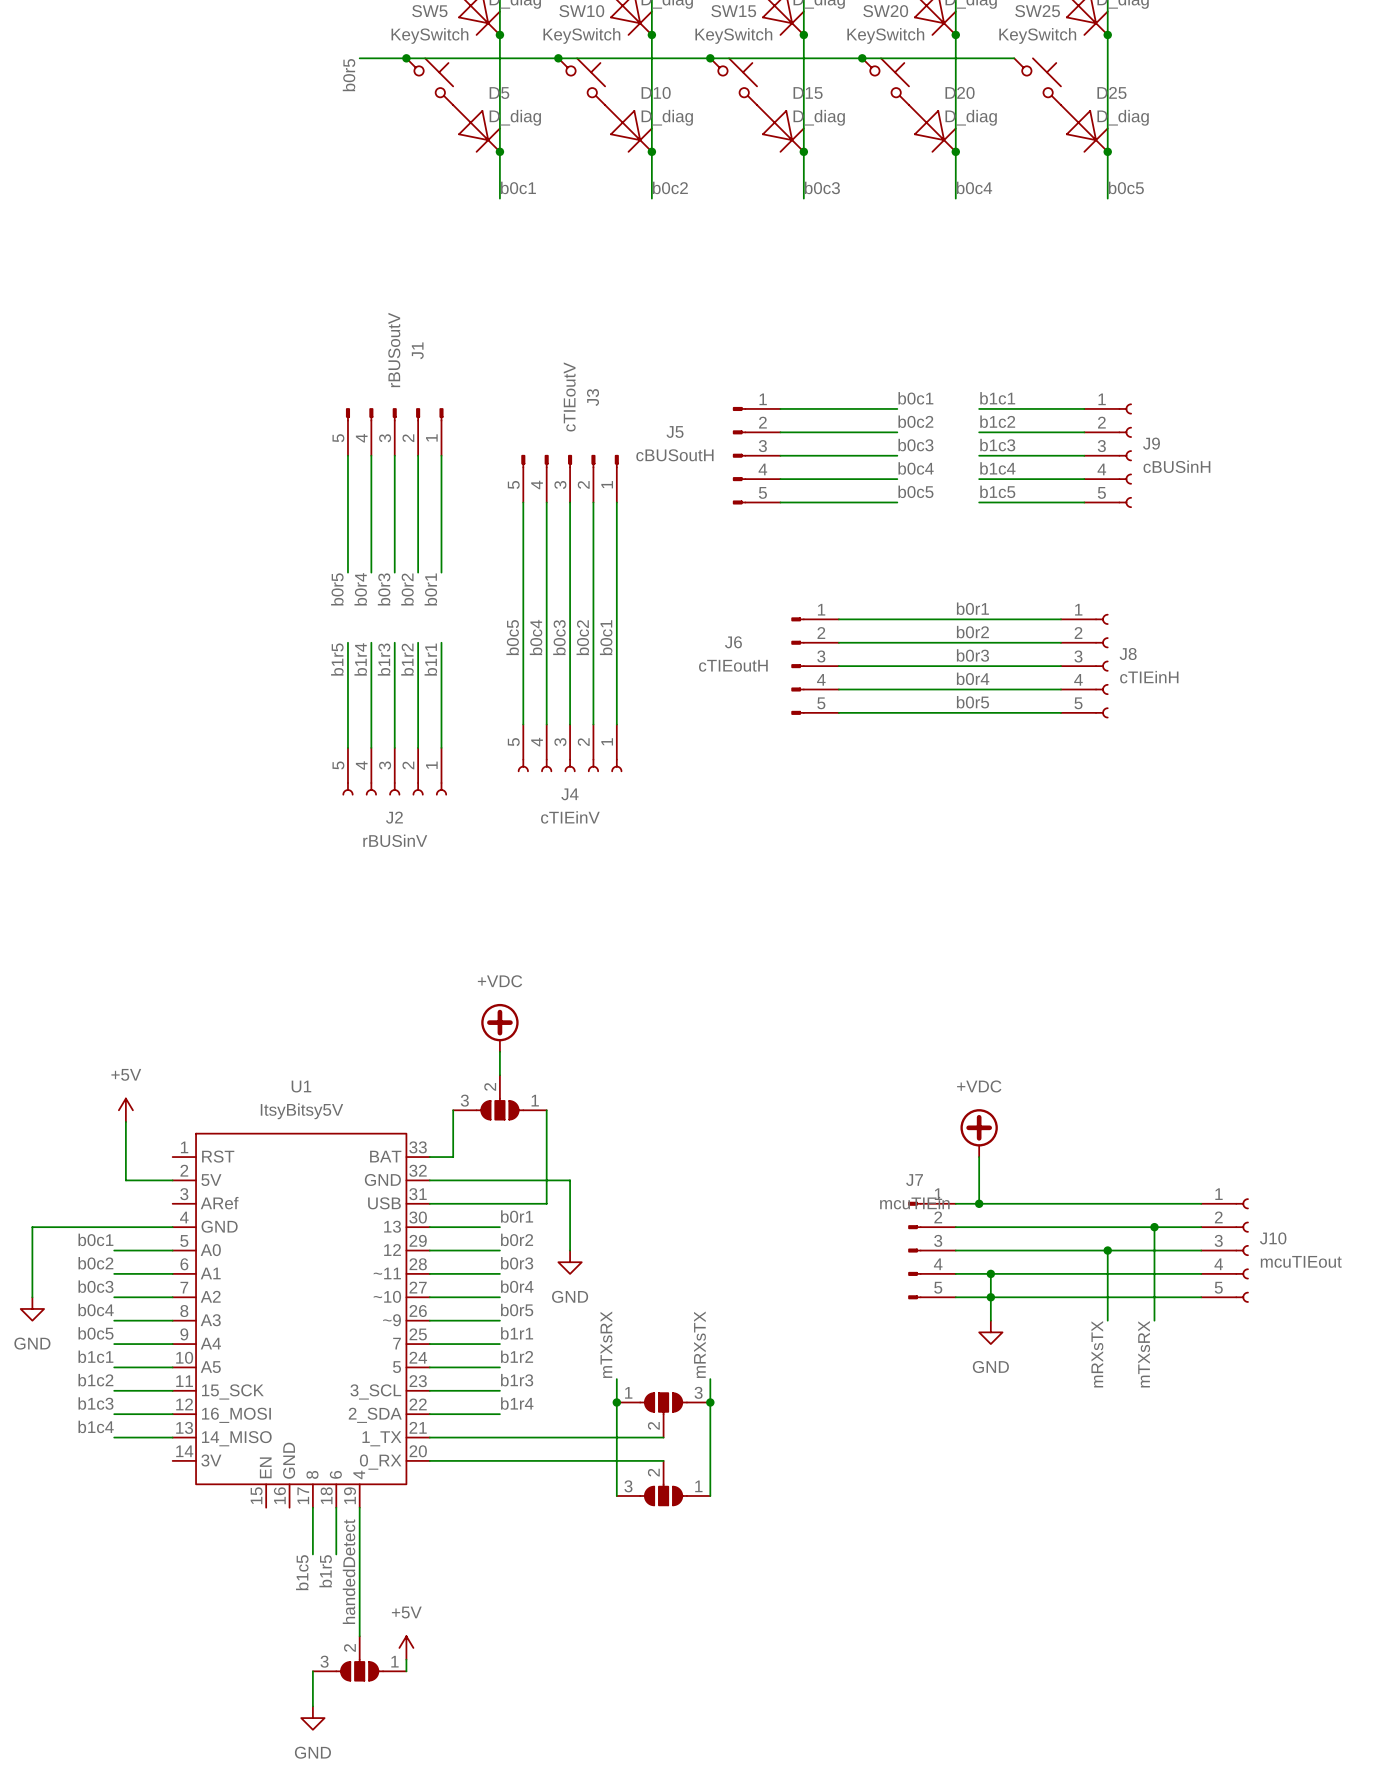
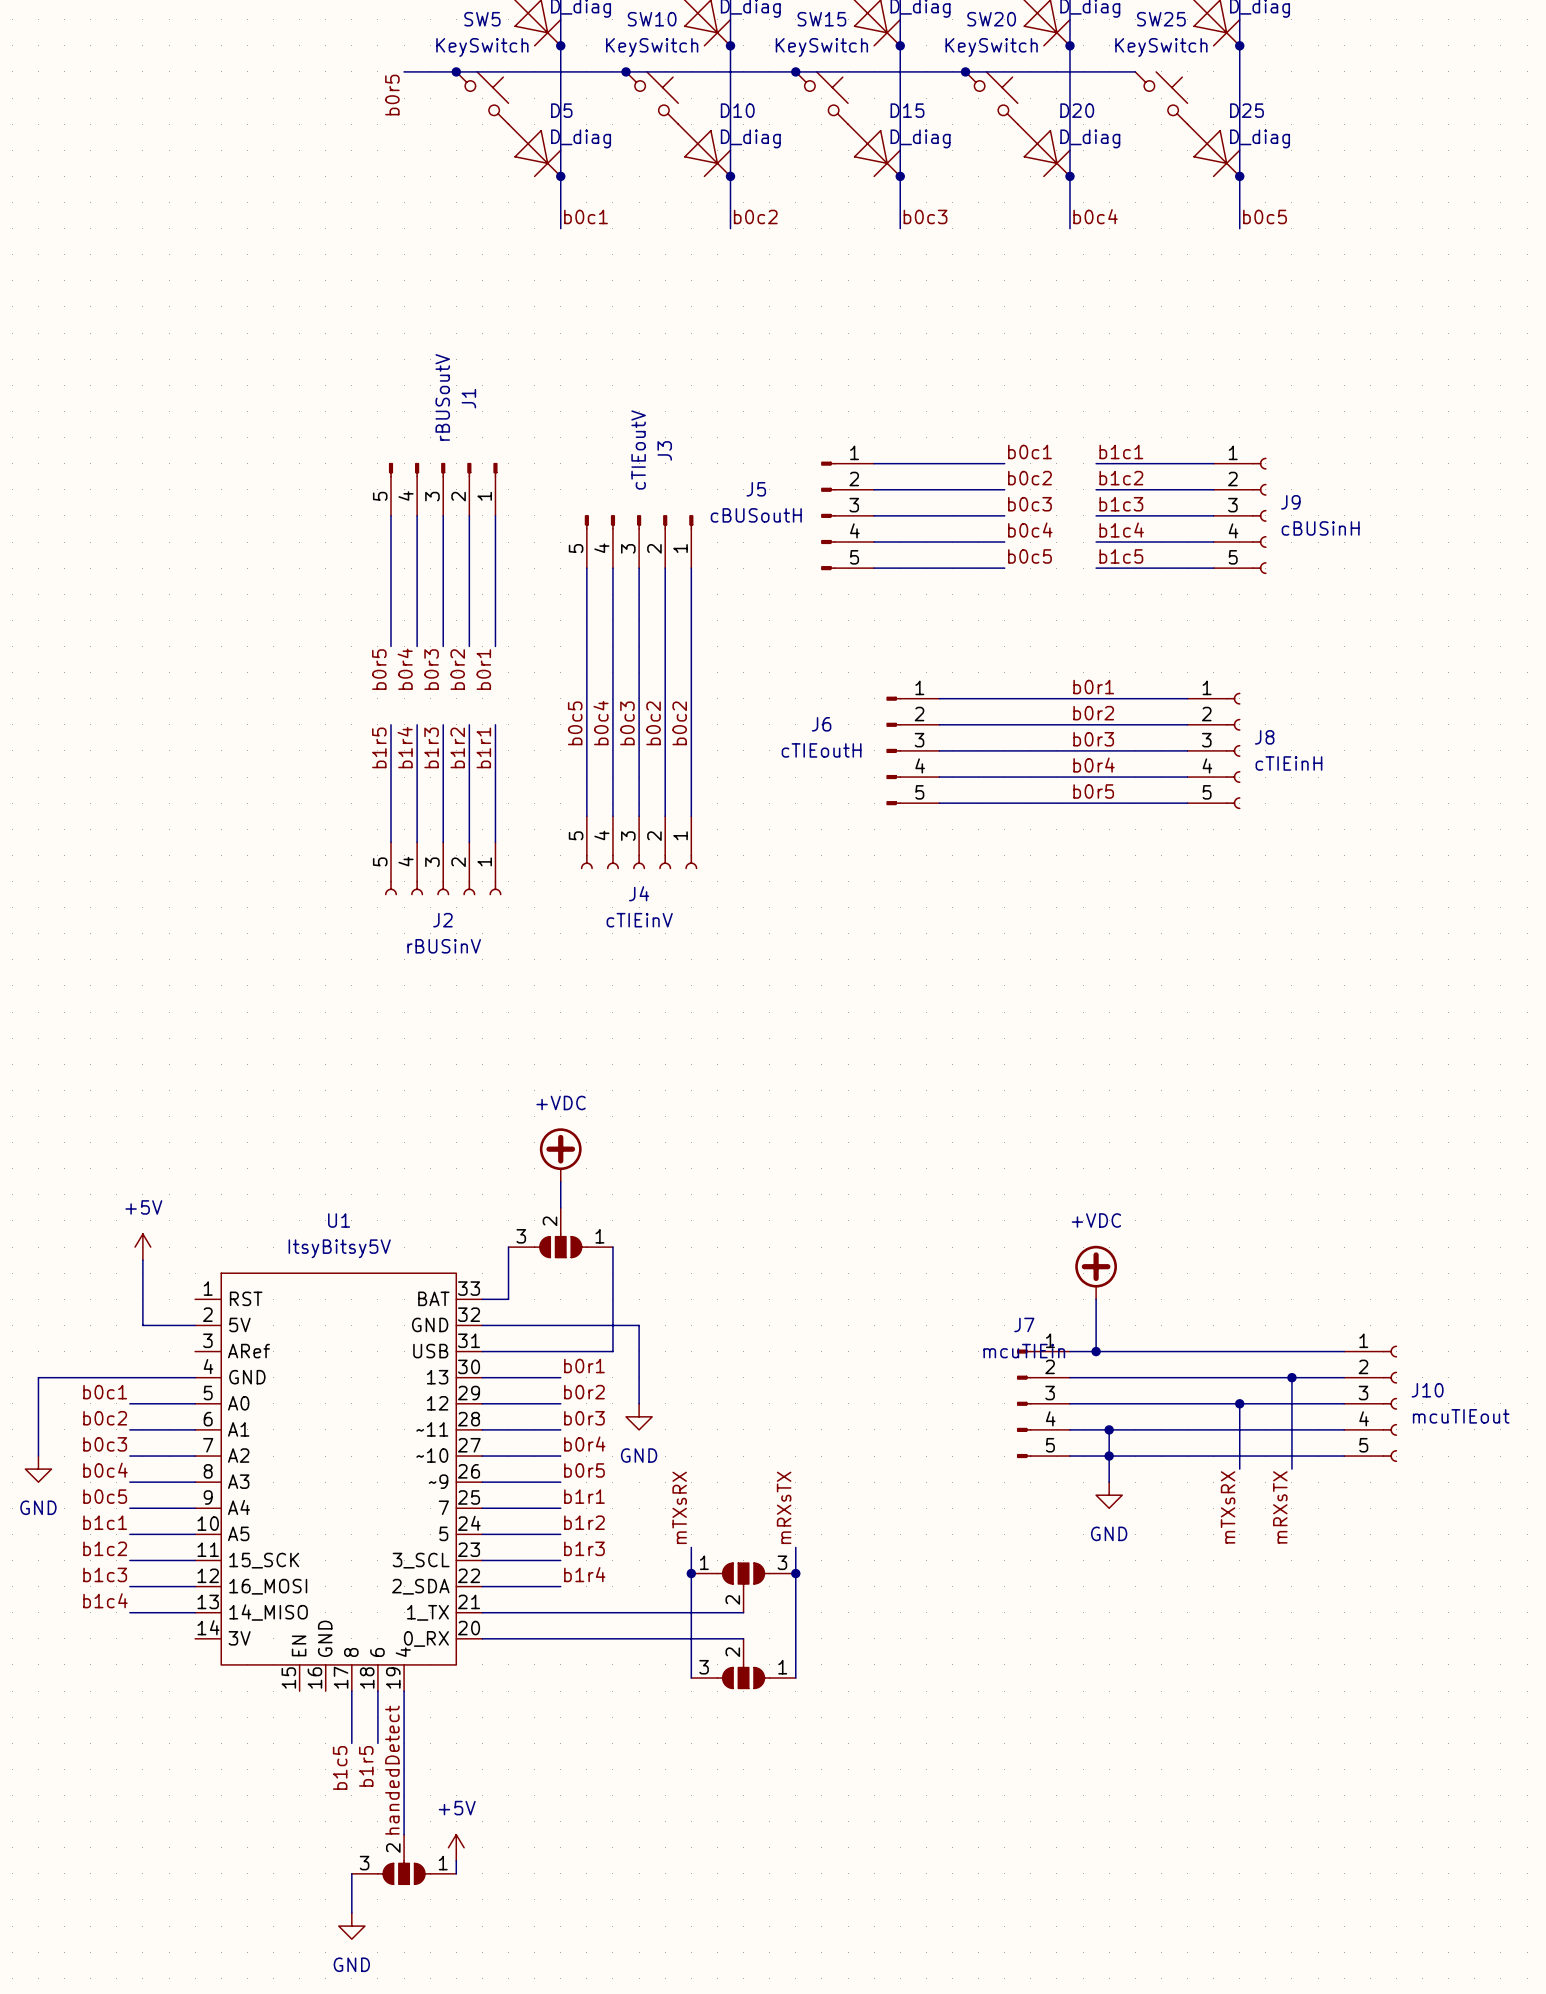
label: b0c1 (606, 637) -> b0c2 (679, 723)
wire: (1107, 1308) (1107, 1320) -> none
wire: (1154, 1308) (1154, 1320) -> none
label position: mRXsTX (1097, 1354) -> mRXsTX (1280, 1507)
label position: mTXsRX (1144, 1354) -> mTXsRX (1228, 1507)

